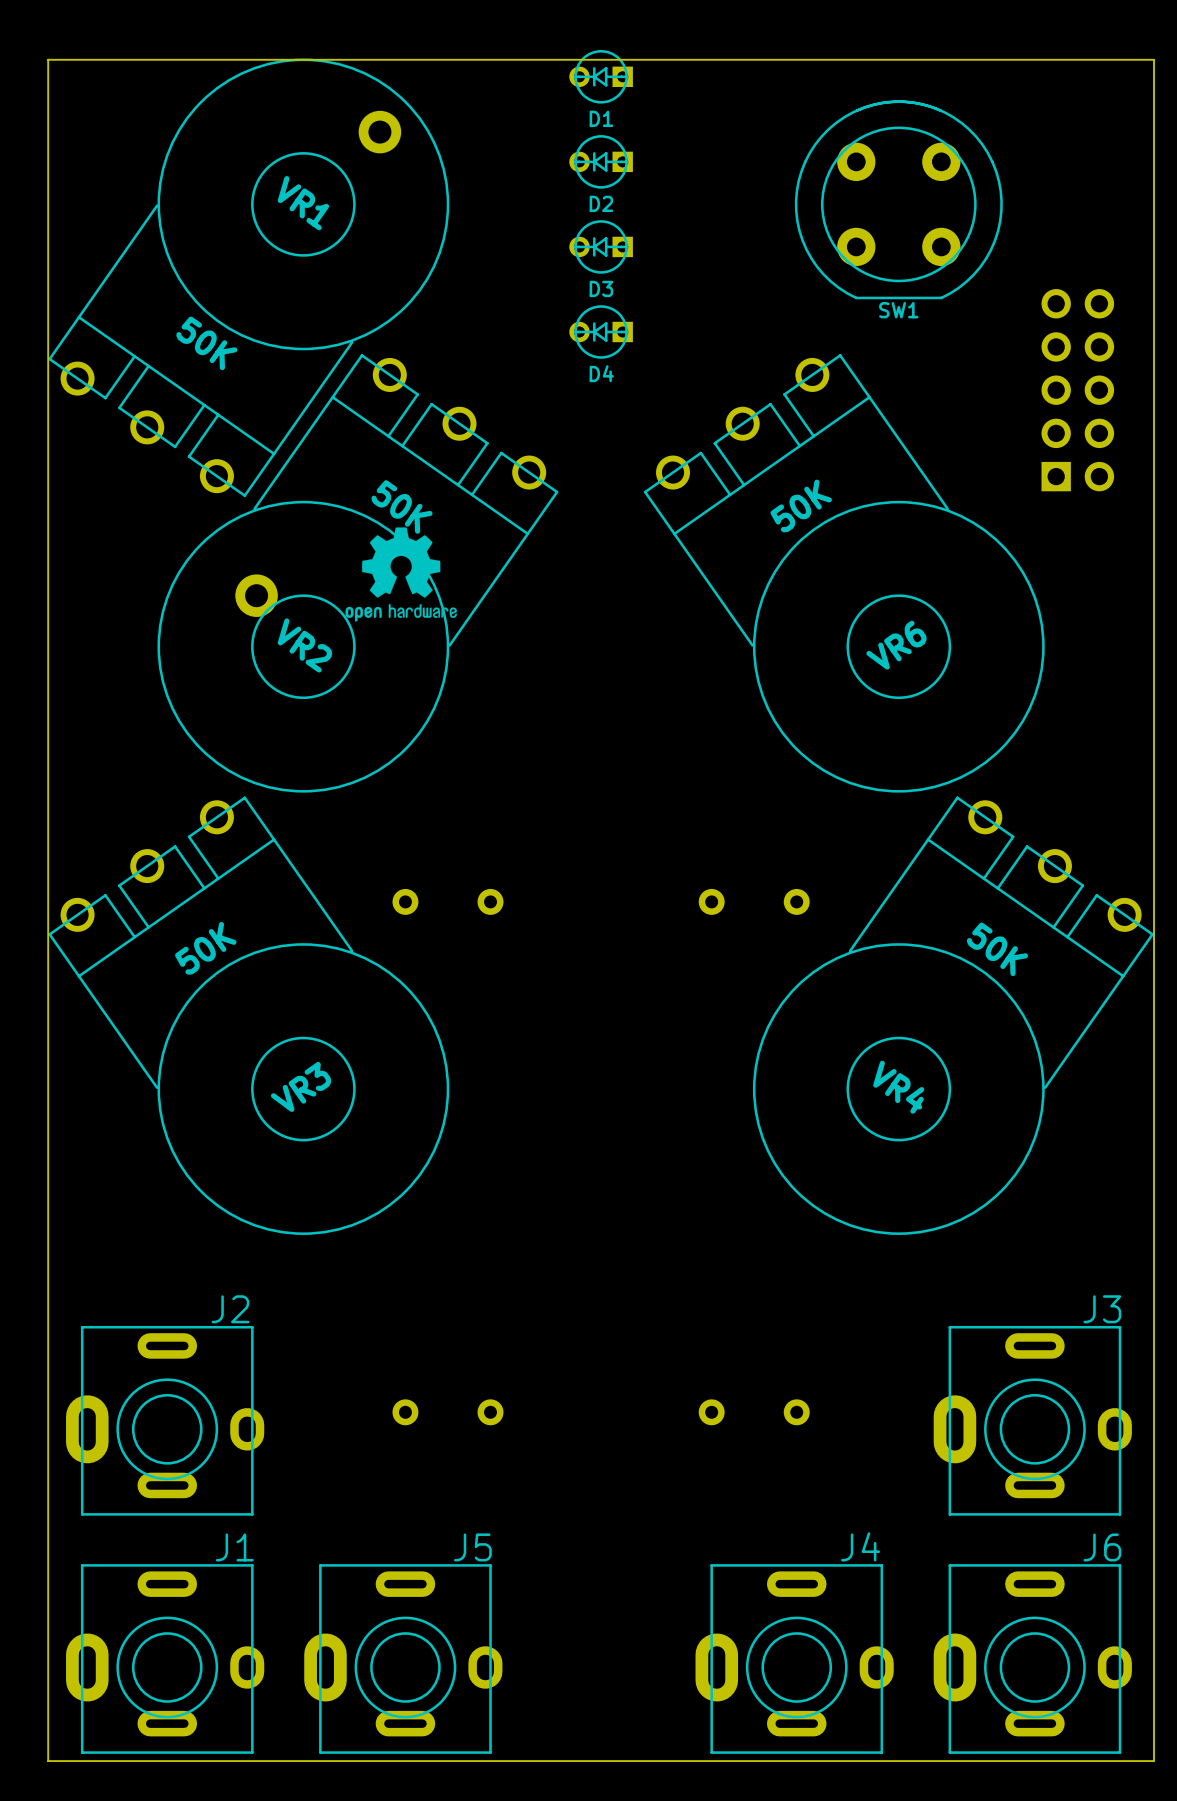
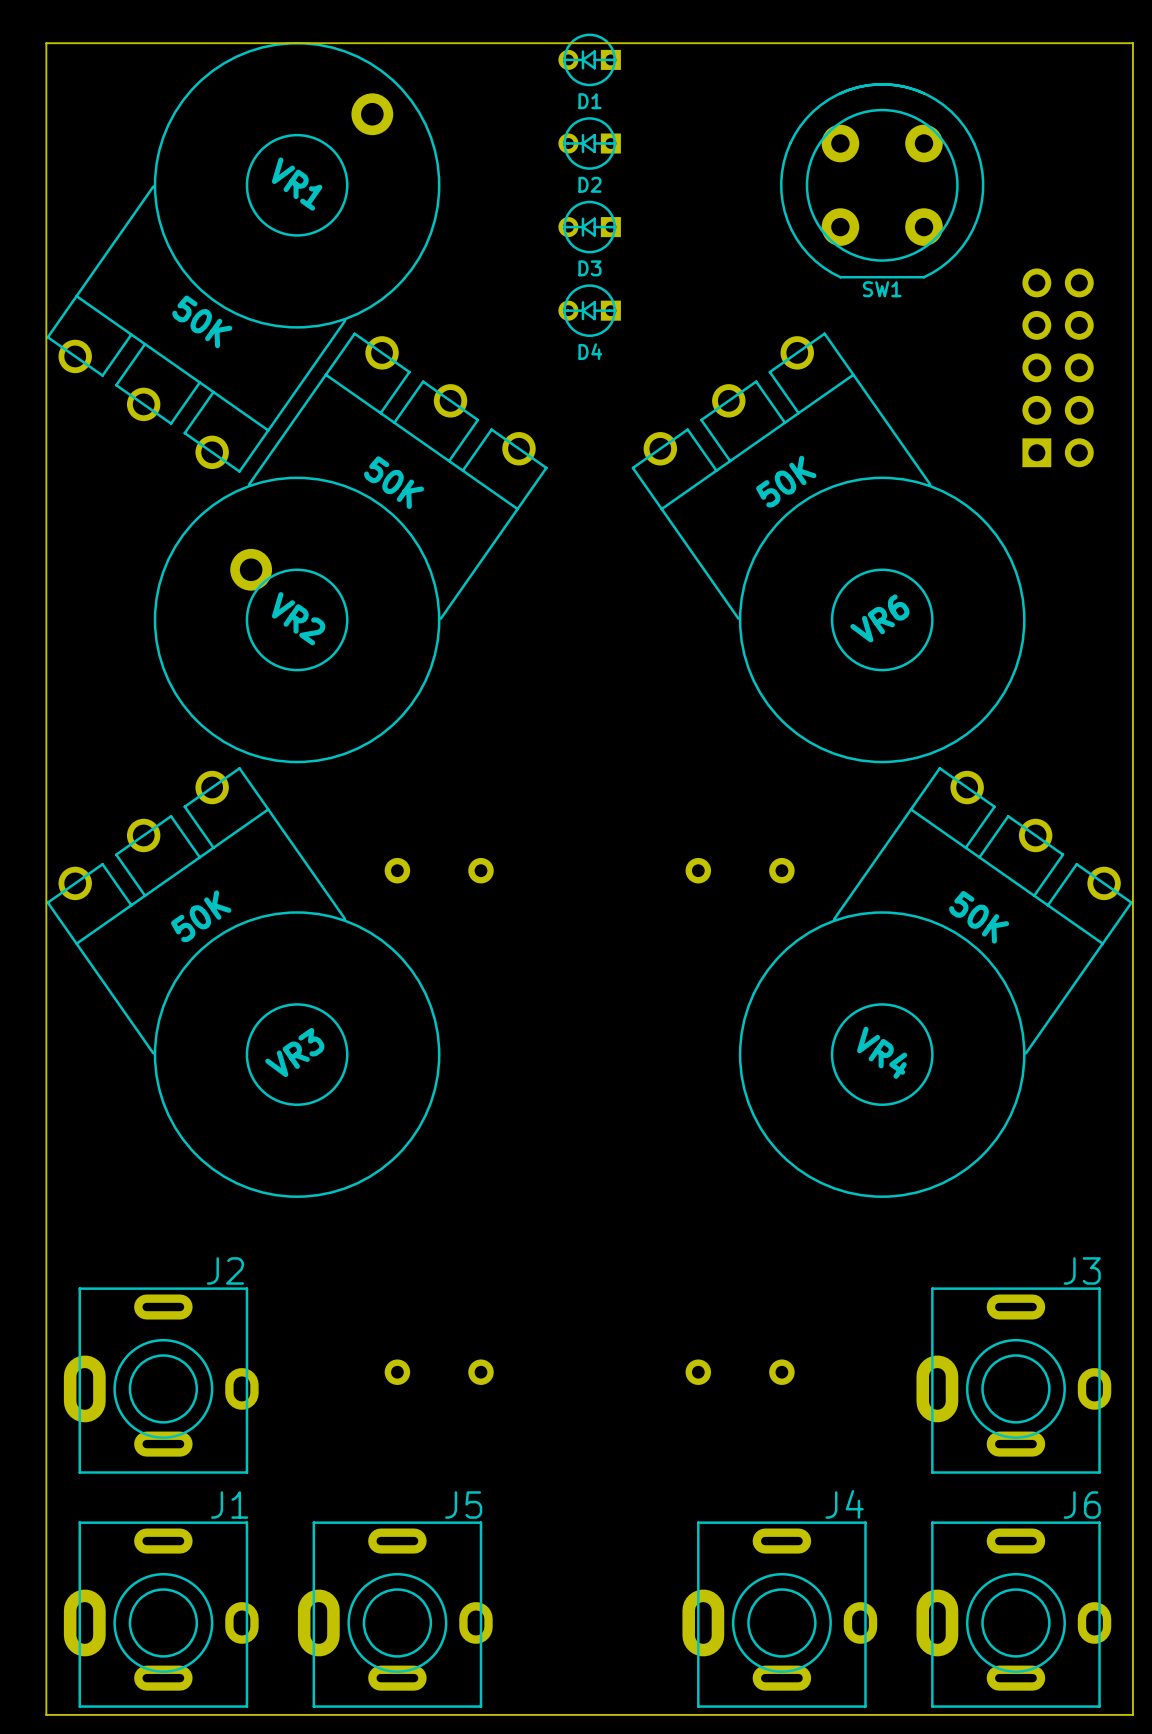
drawing: [345, 527, 457, 622] -> none

